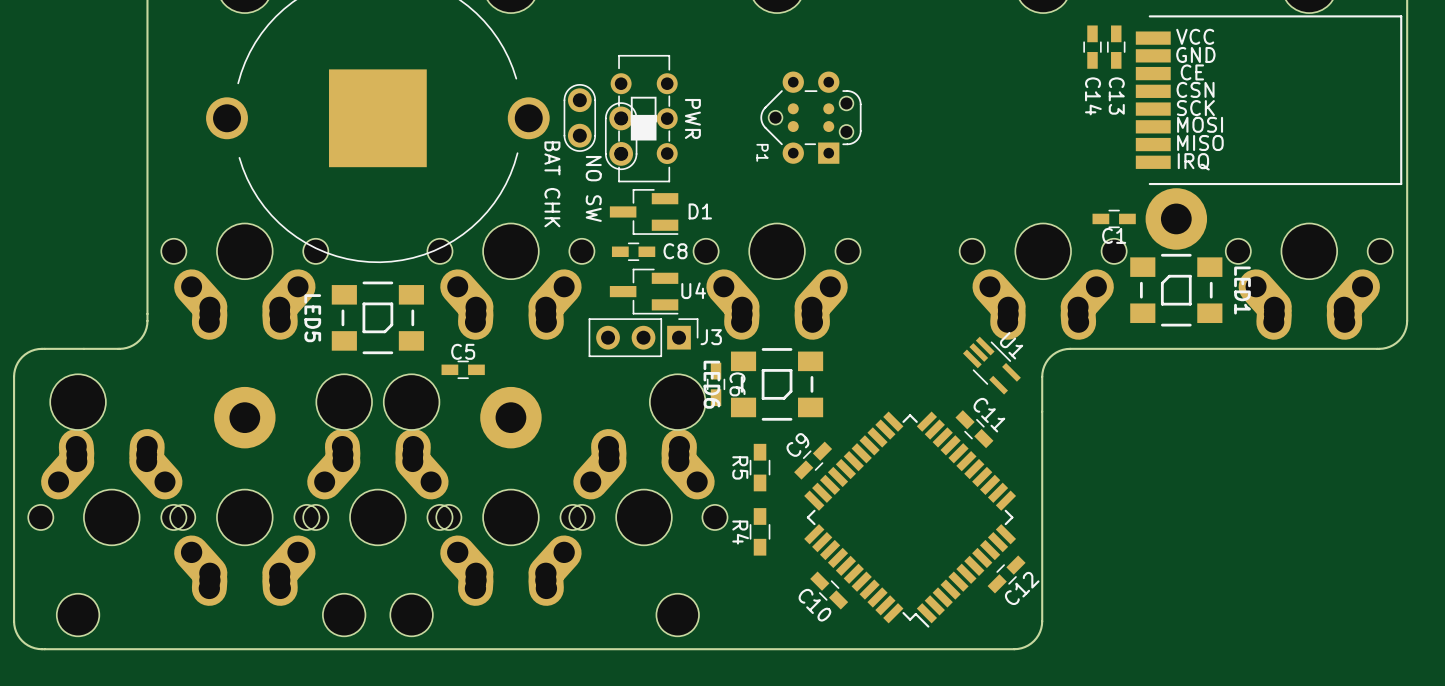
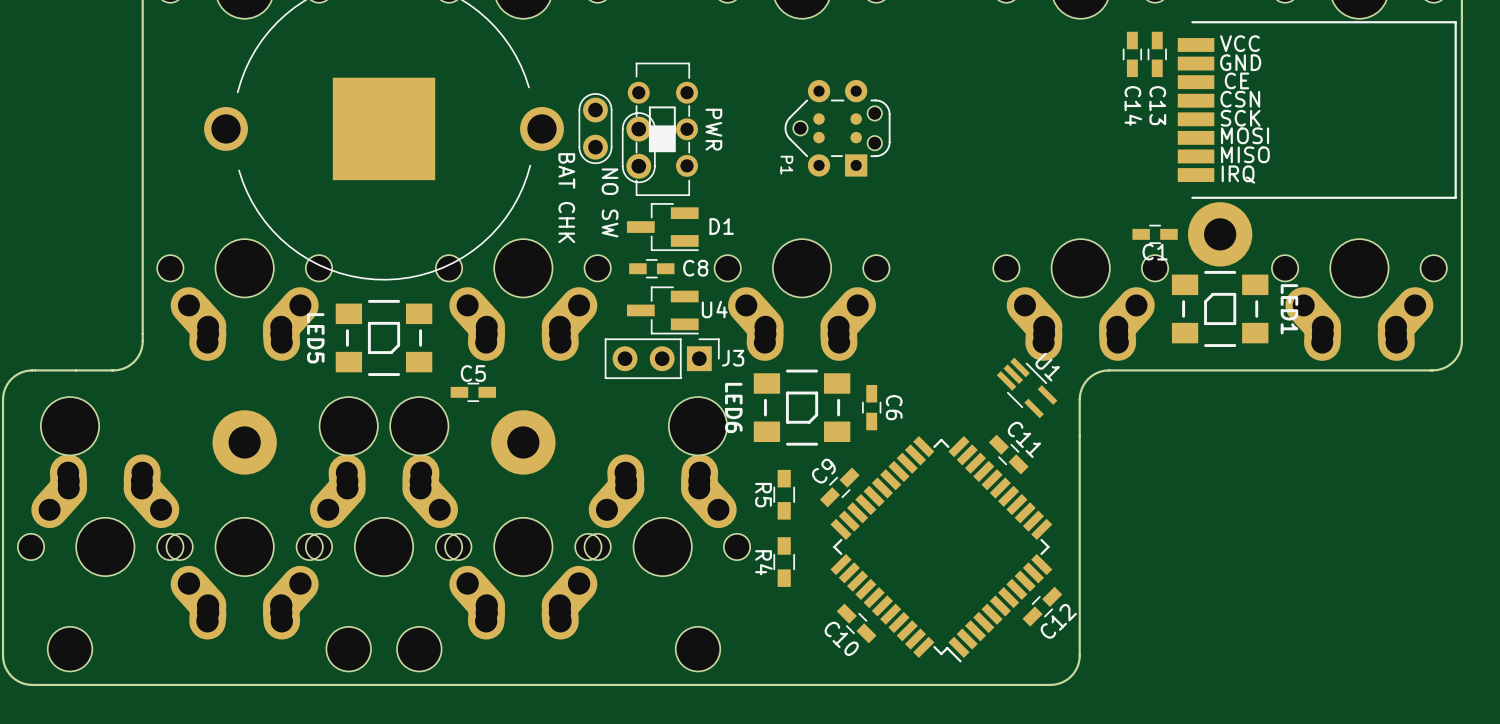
C6 position: (716, 384) -> (871, 407)

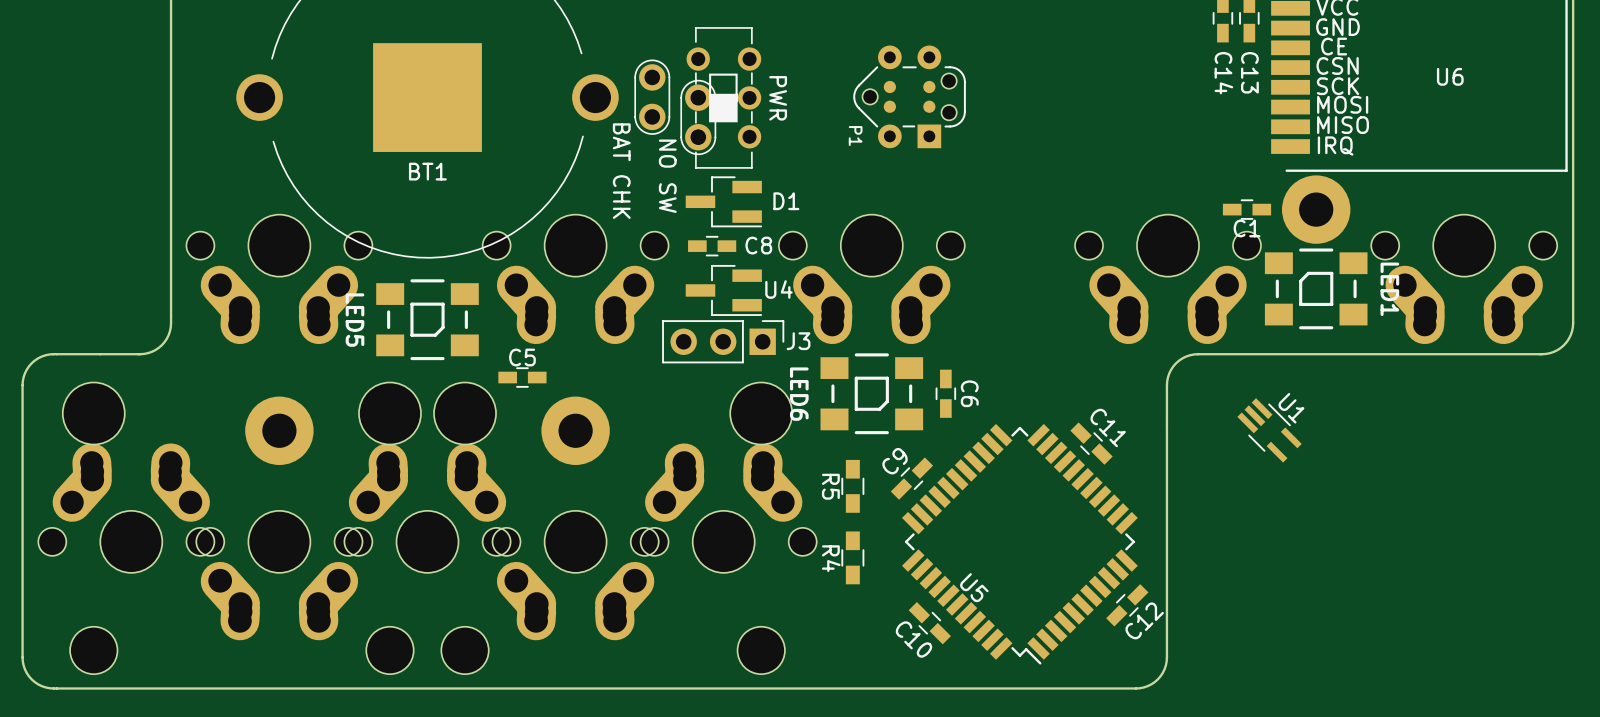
U6 name: none -> U6 (1450, 76)
BT1 name: none -> BT1 (427, 171)
U1 position: (1027, 387) -> (1269, 430)
U5 name: none -> U5 (974, 587)

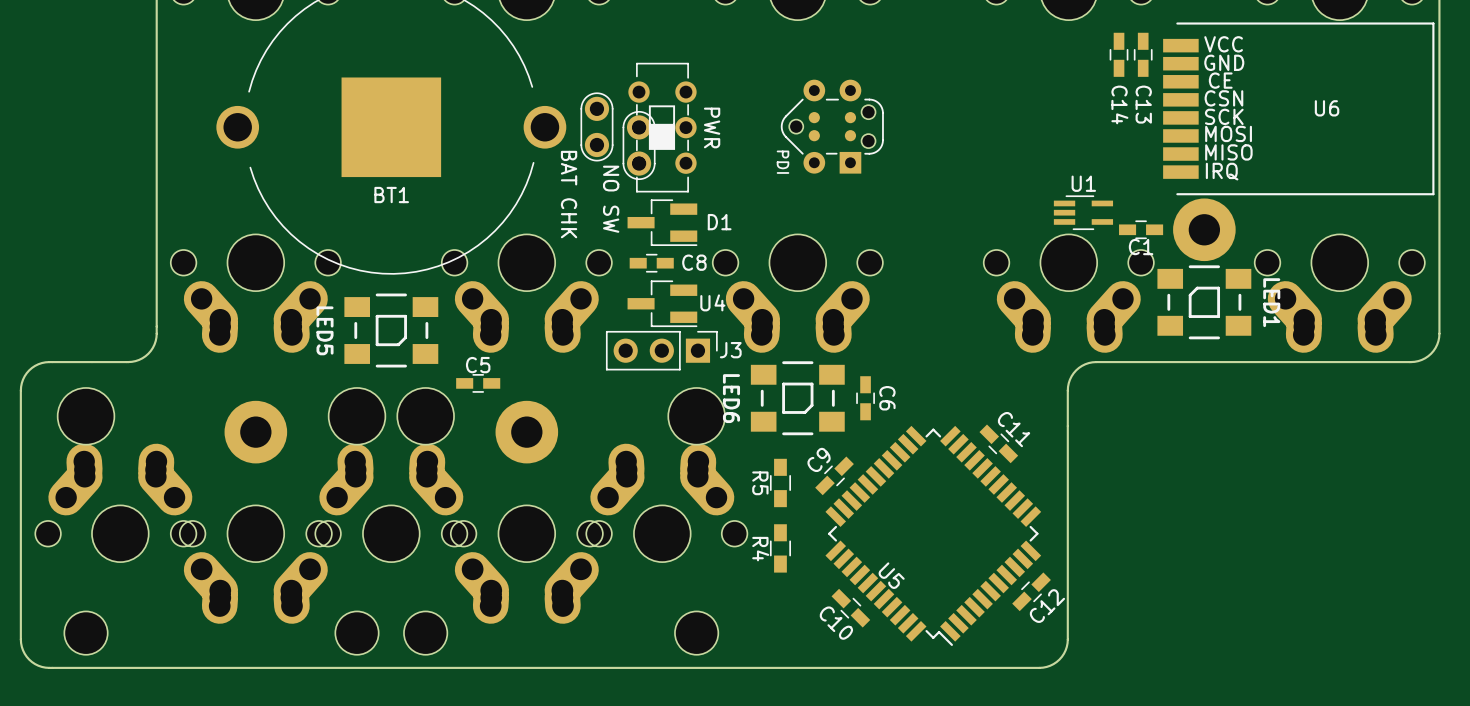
P1 name: P1 (855, 136) -> PDI (783, 162)
U1 rotation: 0° (1269, 430) -> 45° counterclockwise (1083, 212)
U1 position: (1269, 430) -> (1083, 212)

